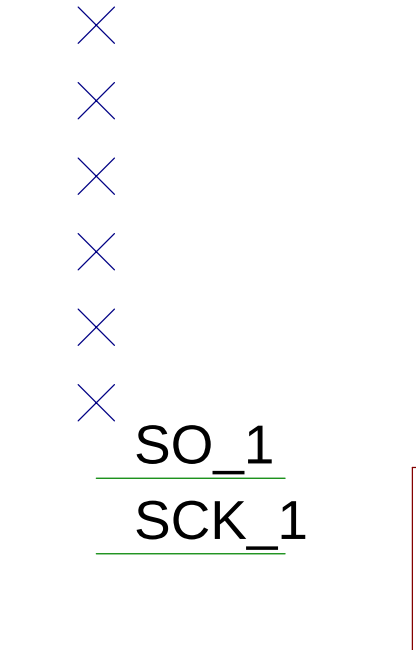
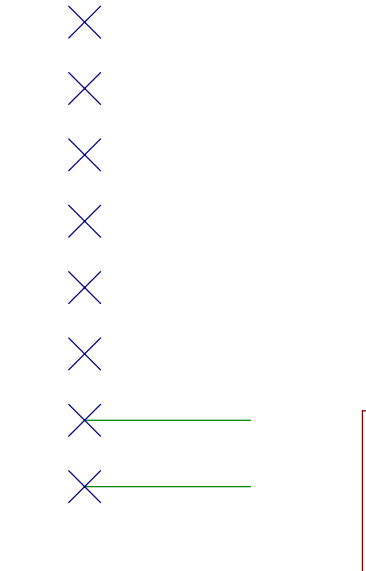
label: SO_1 (204, 449) -> none
no-connect mark: none -> (84, 420)
label: SCK_1 (220, 525) -> none
no-connect mark: none -> (84, 486)

